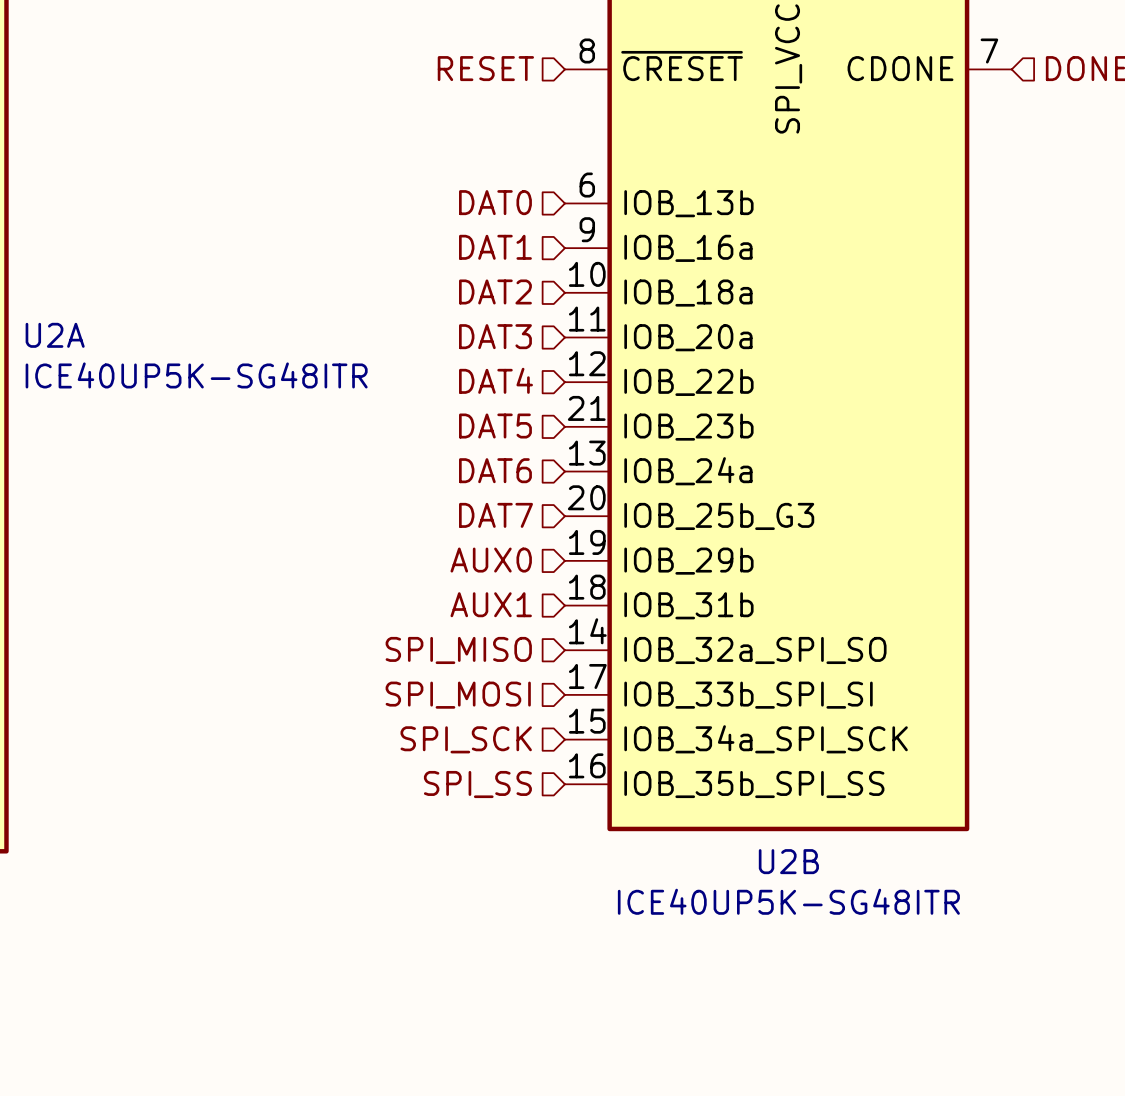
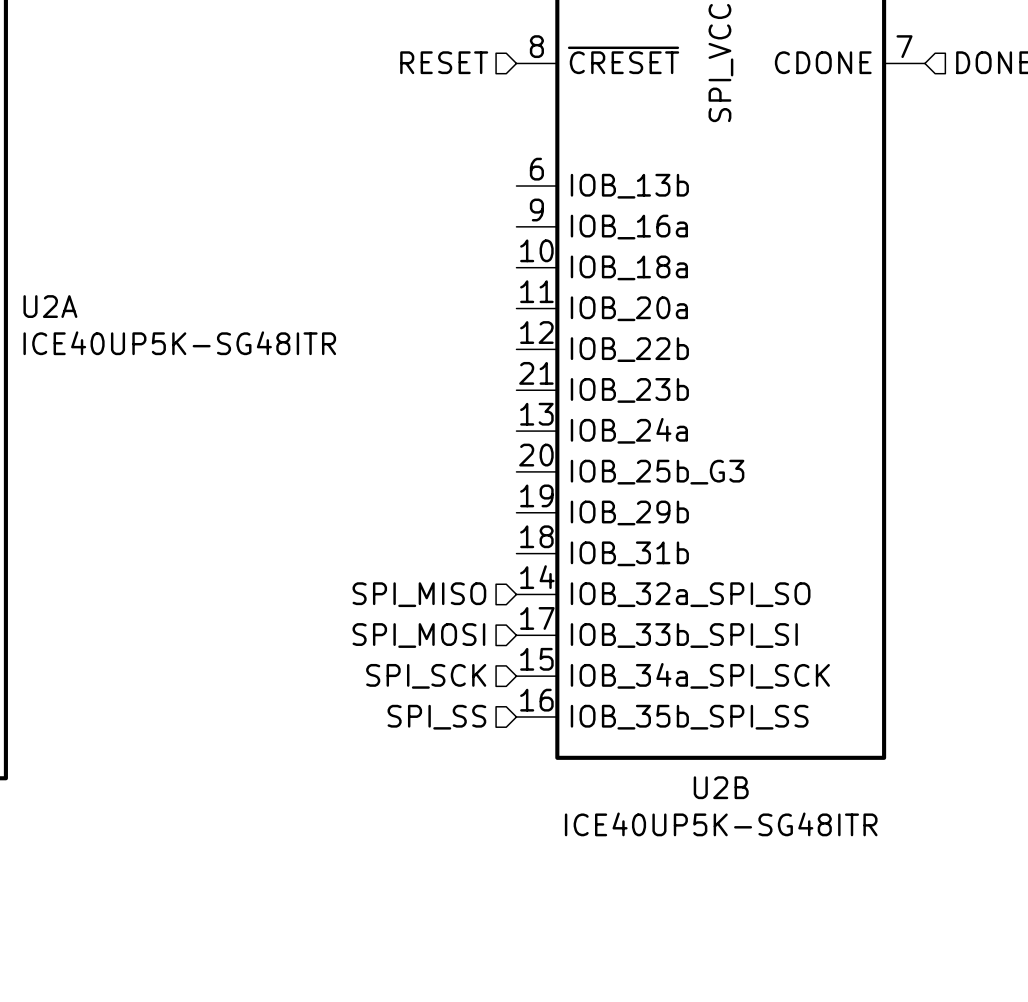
hierarchical label: DAT0 (495, 202) -> none
hierarchical label: DAT1 (495, 247) -> none
hierarchical label: DAT2 (495, 291) -> none
hierarchical label: DAT3 (495, 336) -> none
hierarchical label: DAT4 (495, 380) -> none
hierarchical label: DAT5 (495, 426) -> none
hierarchical label: DAT6 (495, 470) -> none
hierarchical label: DAT7 (495, 515) -> none
hierarchical label: AUX0 (491, 560) -> none
hierarchical label: AUX1 (491, 604) -> none

